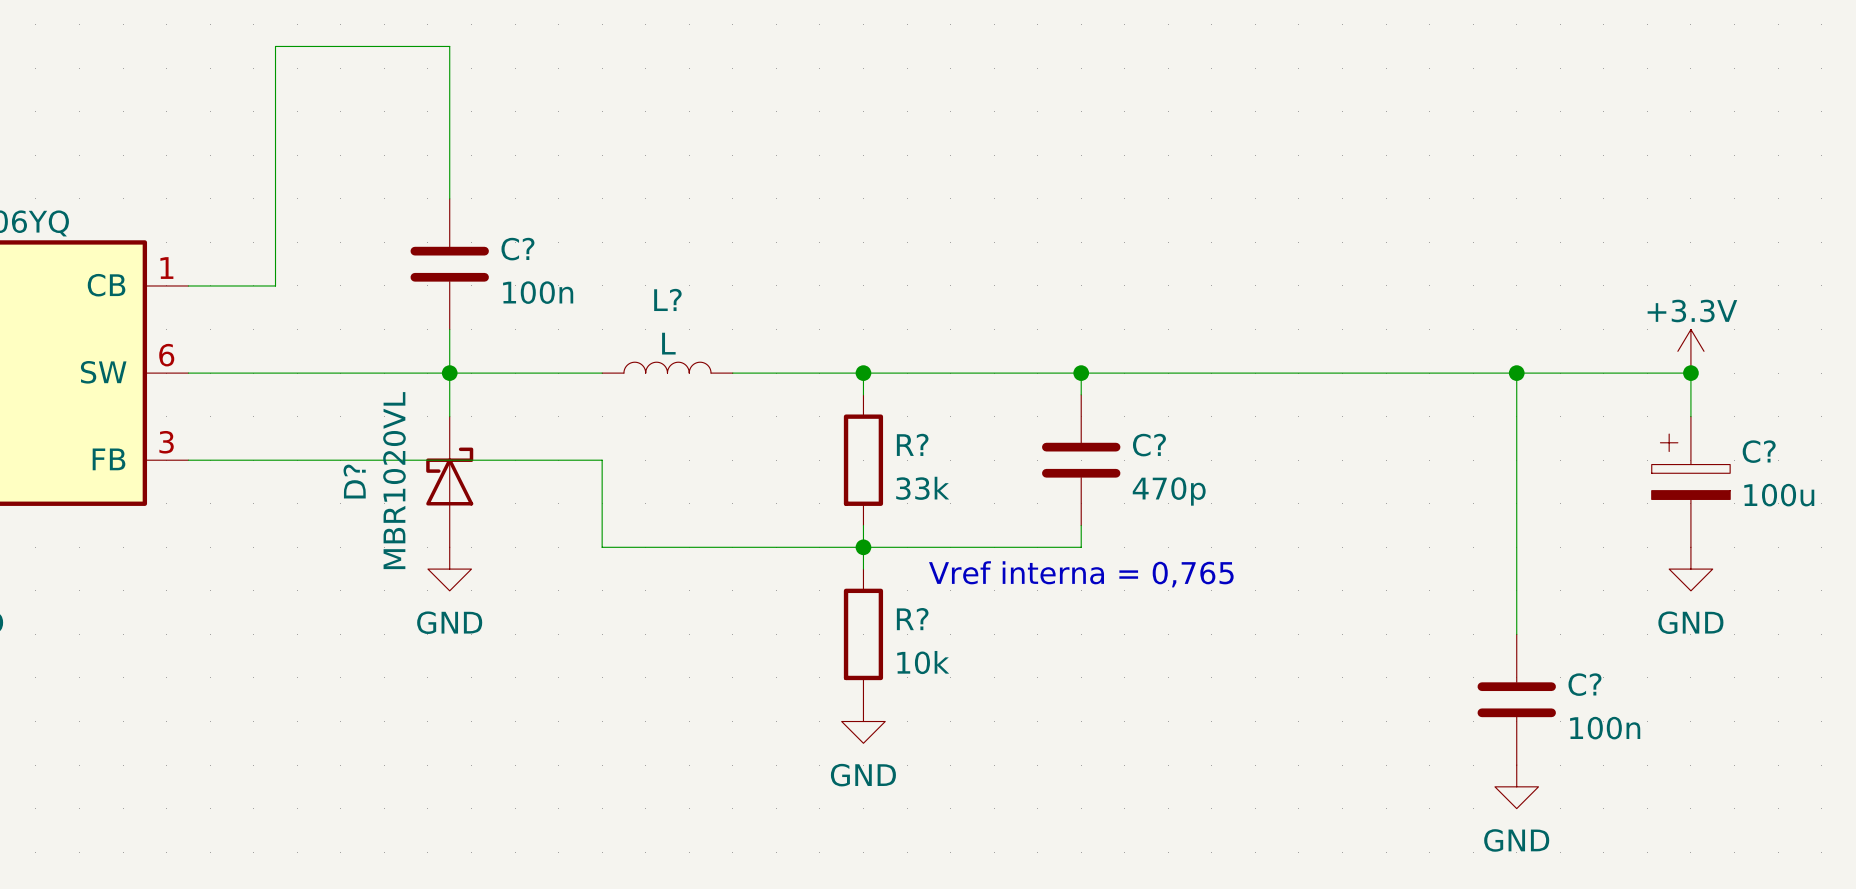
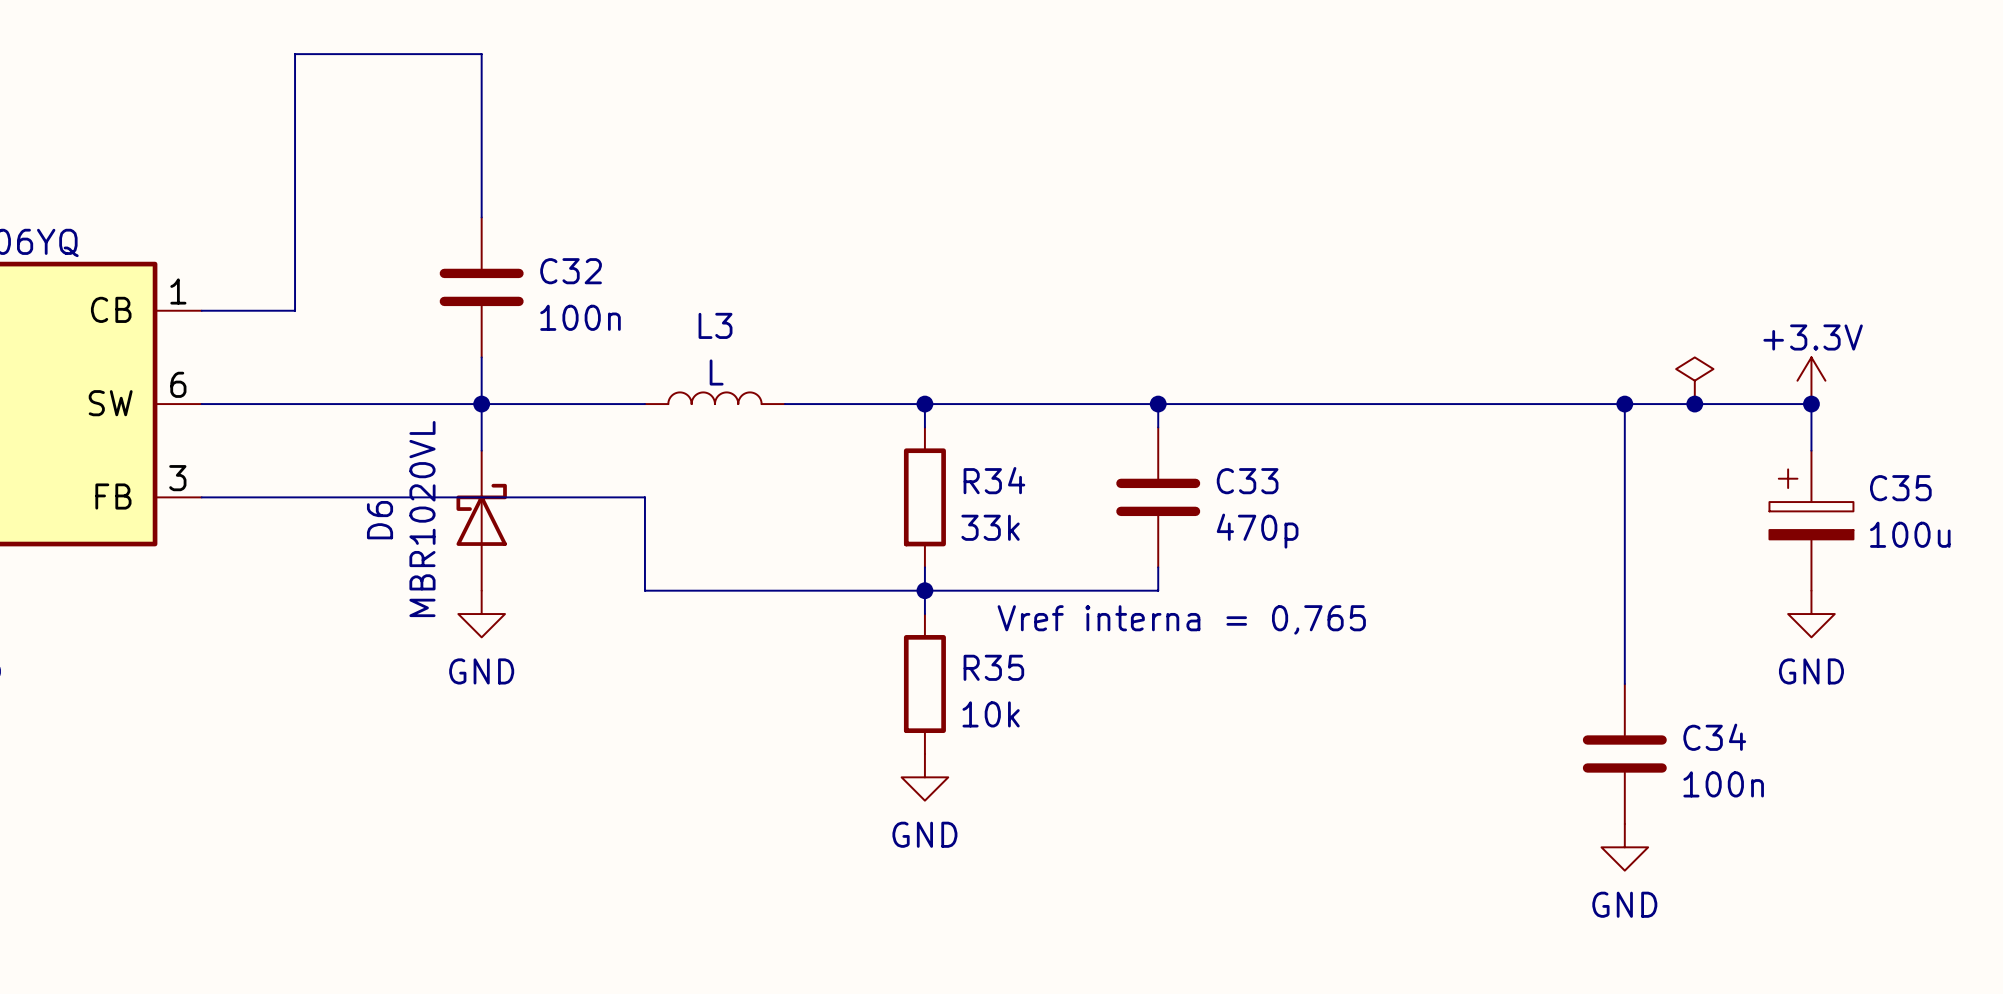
C? name: C? (517, 249) -> C32 (571, 271)
L? name: L? (667, 299) -> L3 (715, 325)
power symbol: none -> (1694, 380)
junction: none -> (1694, 404)
R? name: R? (912, 444) -> R34 (994, 480)
C? name: C? (1149, 445) -> C33 (1247, 481)
C? name: C? (1759, 451) -> C35 (1900, 488)
D? name: D? (354, 481) -> D6 (380, 520)
R? name: R? (912, 619) -> R35 (993, 667)
C? name: C? (1584, 684) -> C34 (1714, 737)

